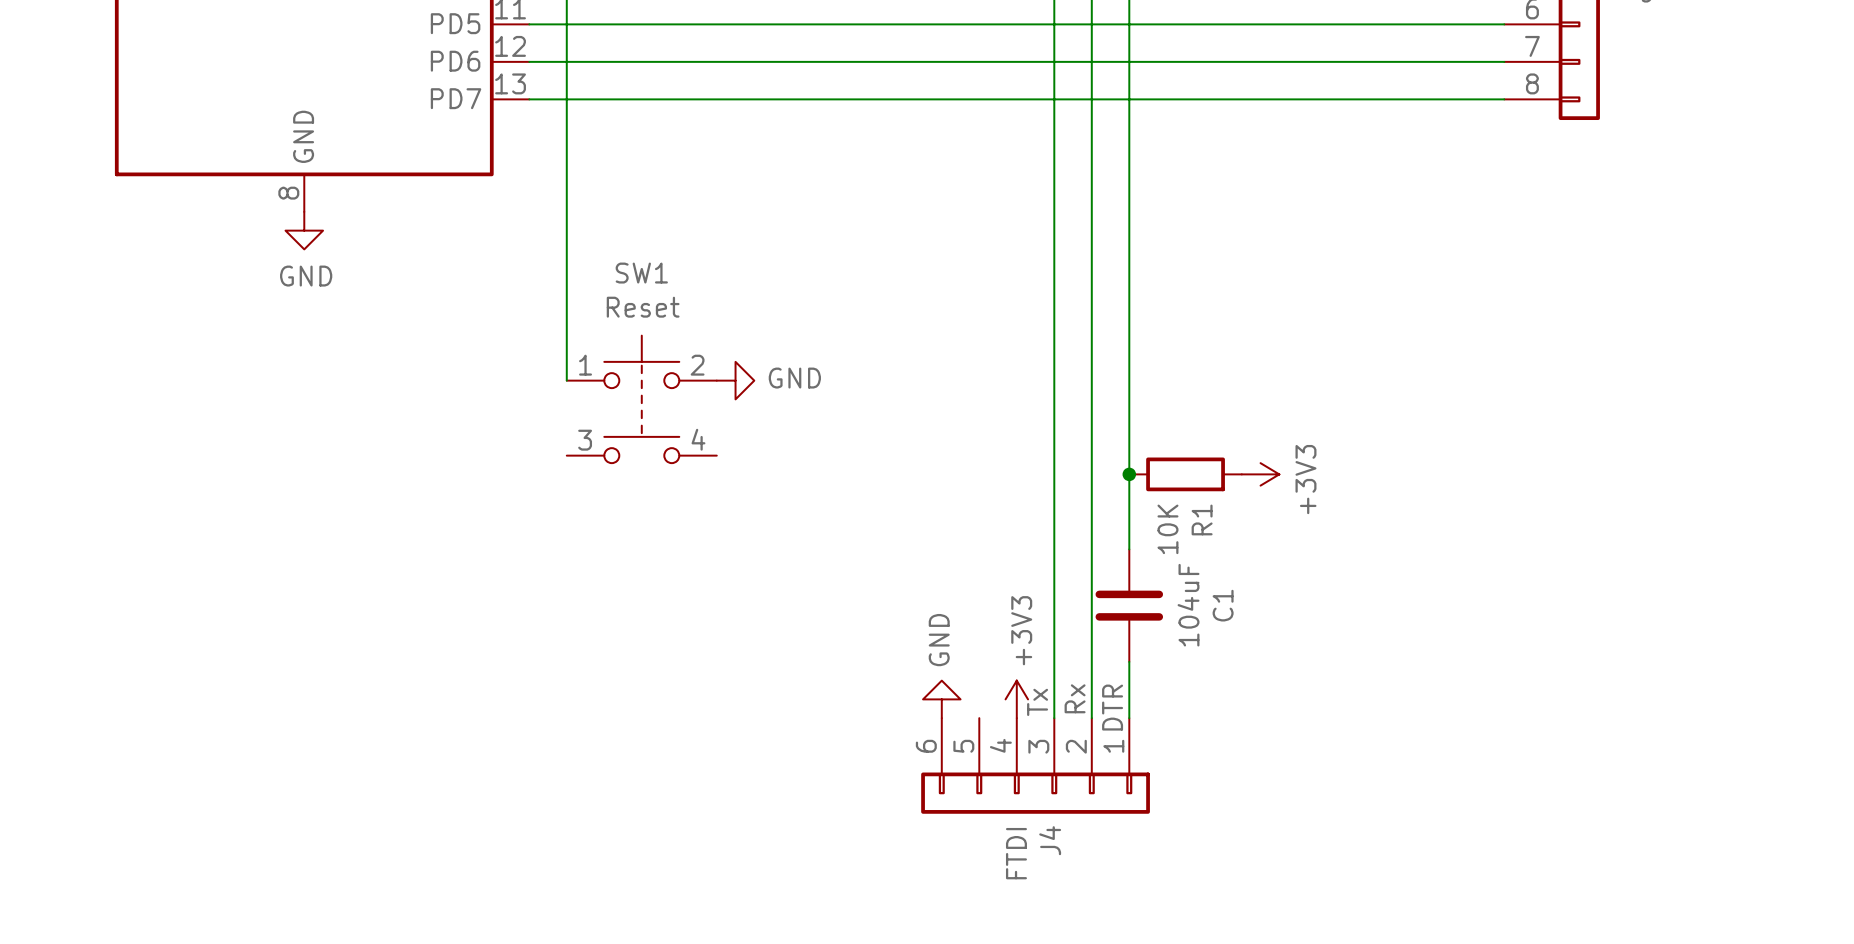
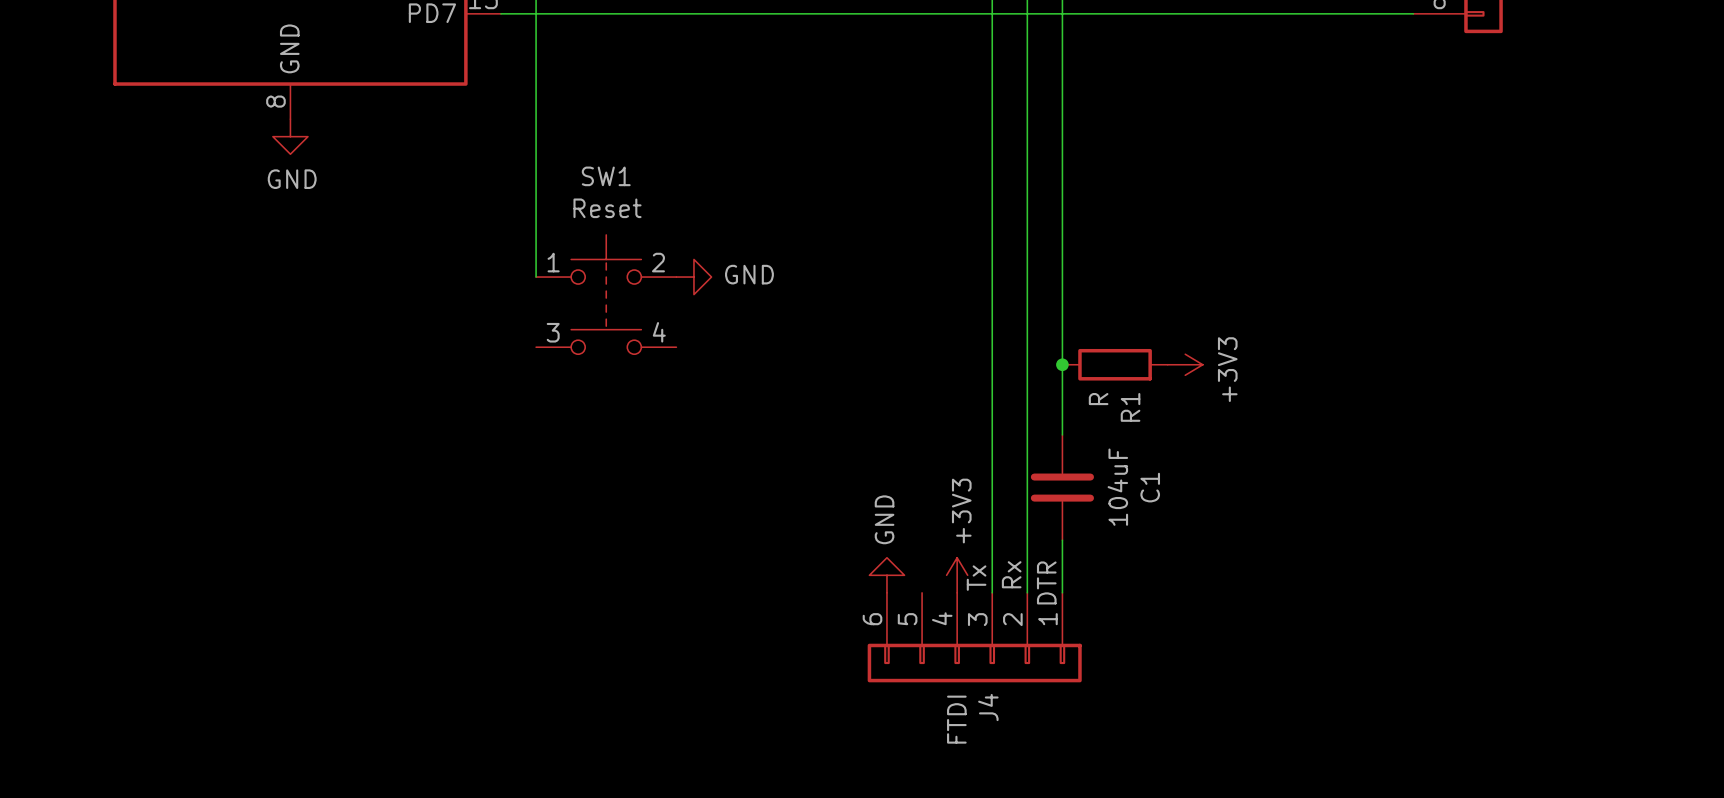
R1 value: 10K (1167, 529) -> R (1098, 399)

